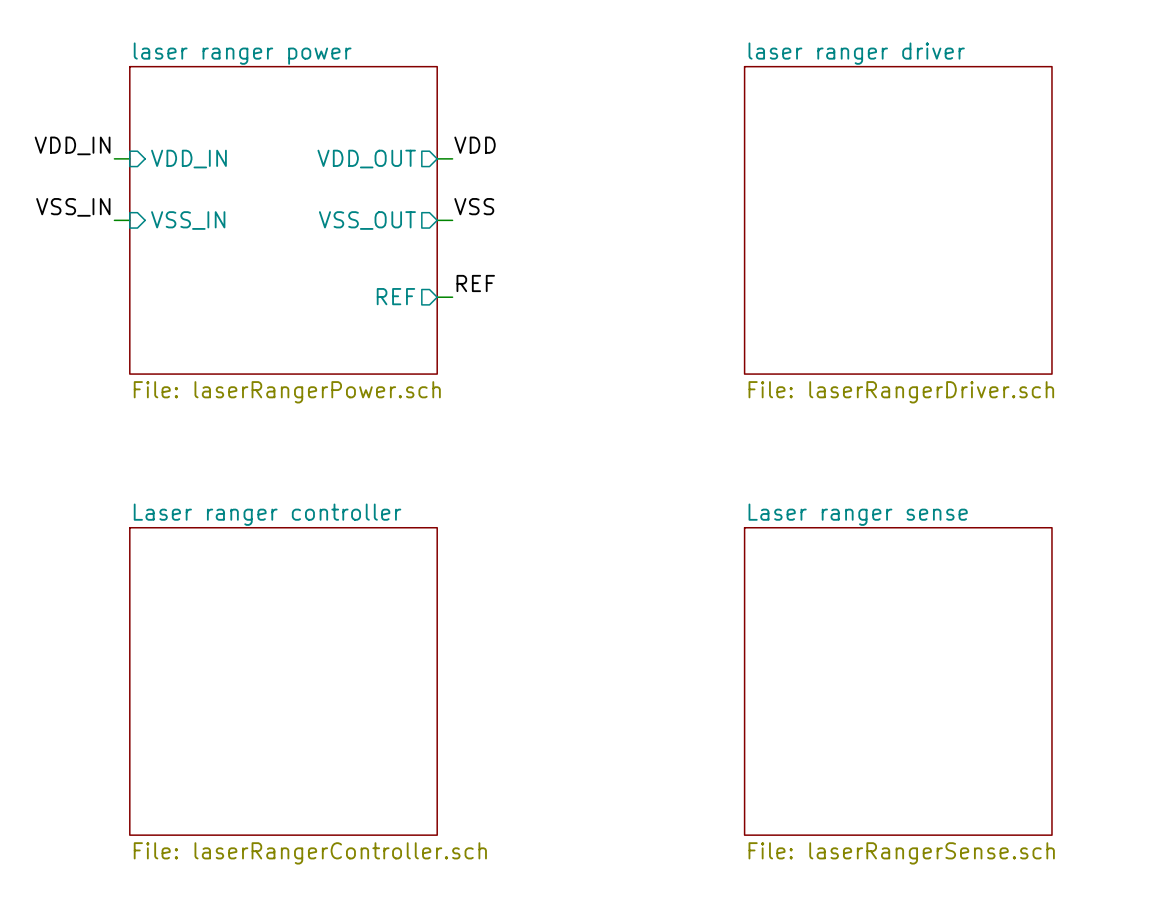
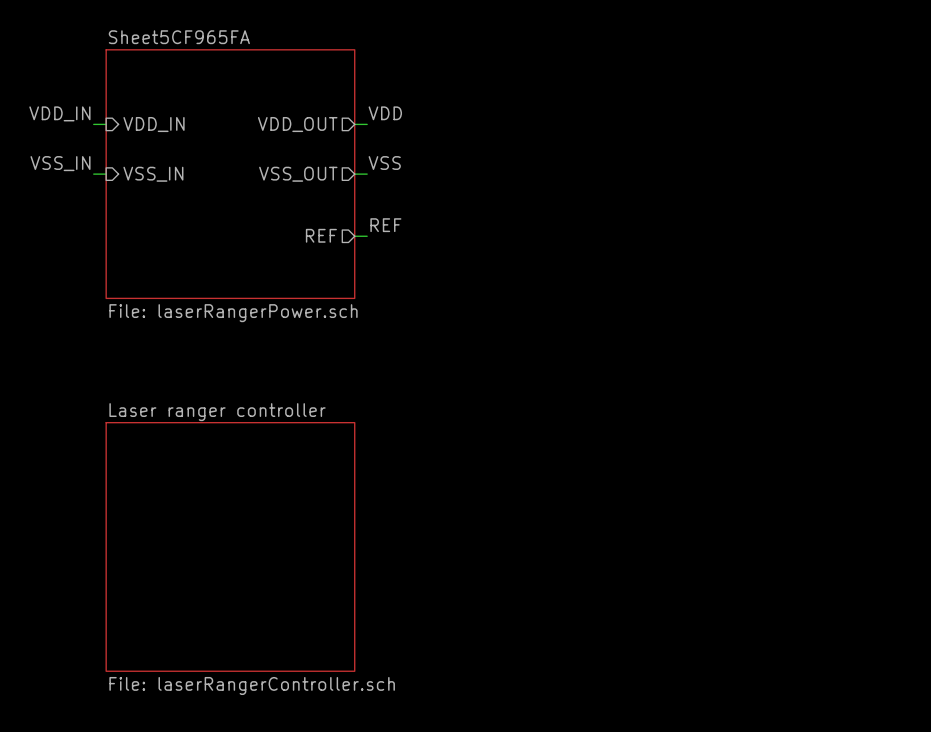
sheet laser ranger power name: laser ranger power (242, 53) -> Sheet5CF965FA (179, 37)
sheet laser ranger driver: File: laserRangerDriver.sch (898, 220) -> none
sheet Laser ranger sense: File: laserRangerSense.sch (898, 681) -> none

